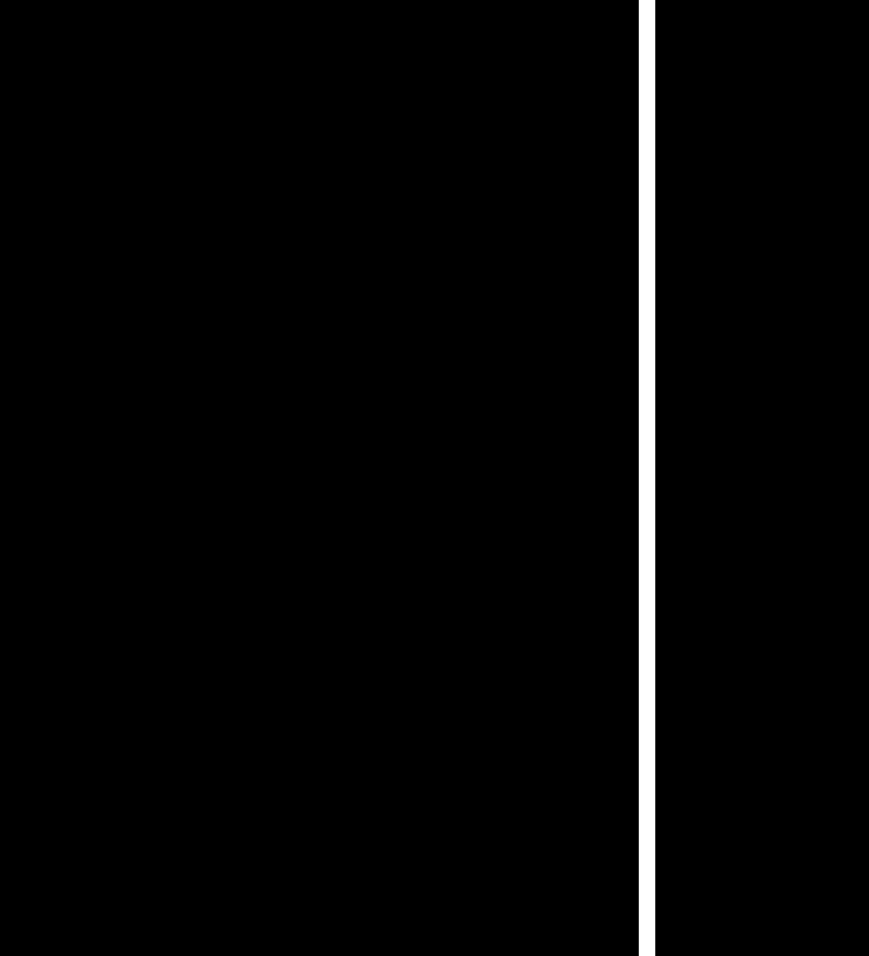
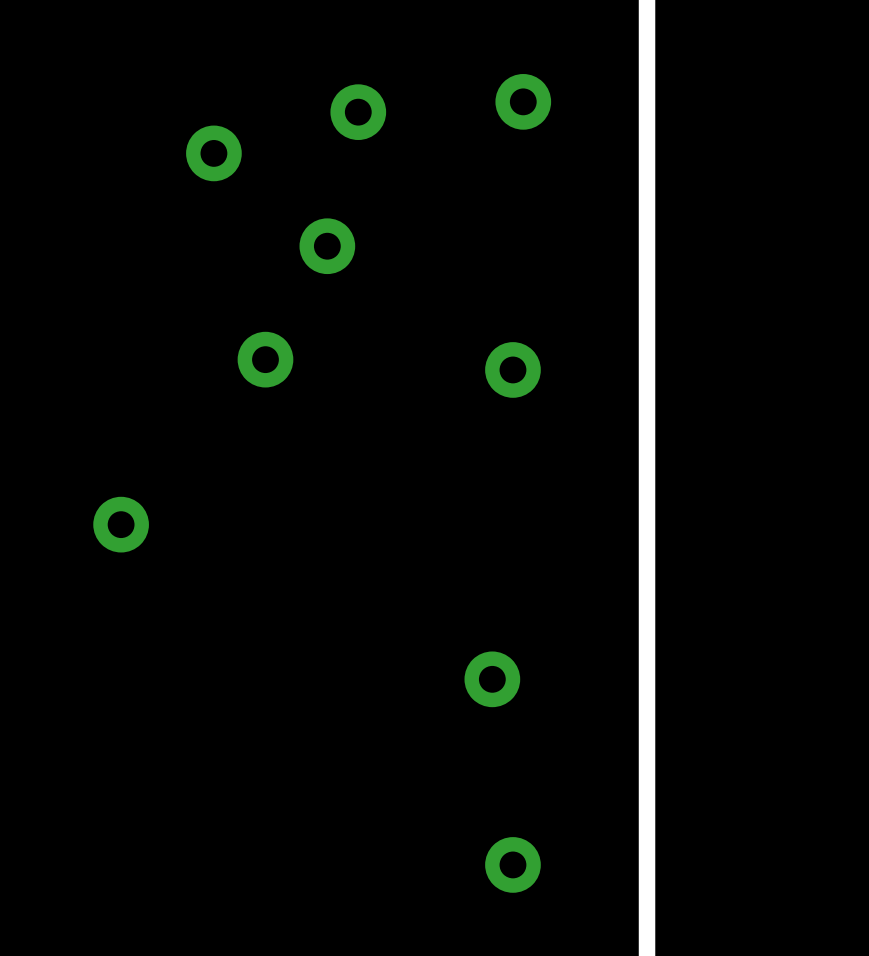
via: none -> (523, 101)
via: none -> (358, 112)
via: none -> (213, 153)
via: none -> (327, 246)
via: none -> (265, 359)
via: none -> (512, 369)
via: none -> (121, 524)
via: none -> (492, 679)
via: none -> (512, 864)

